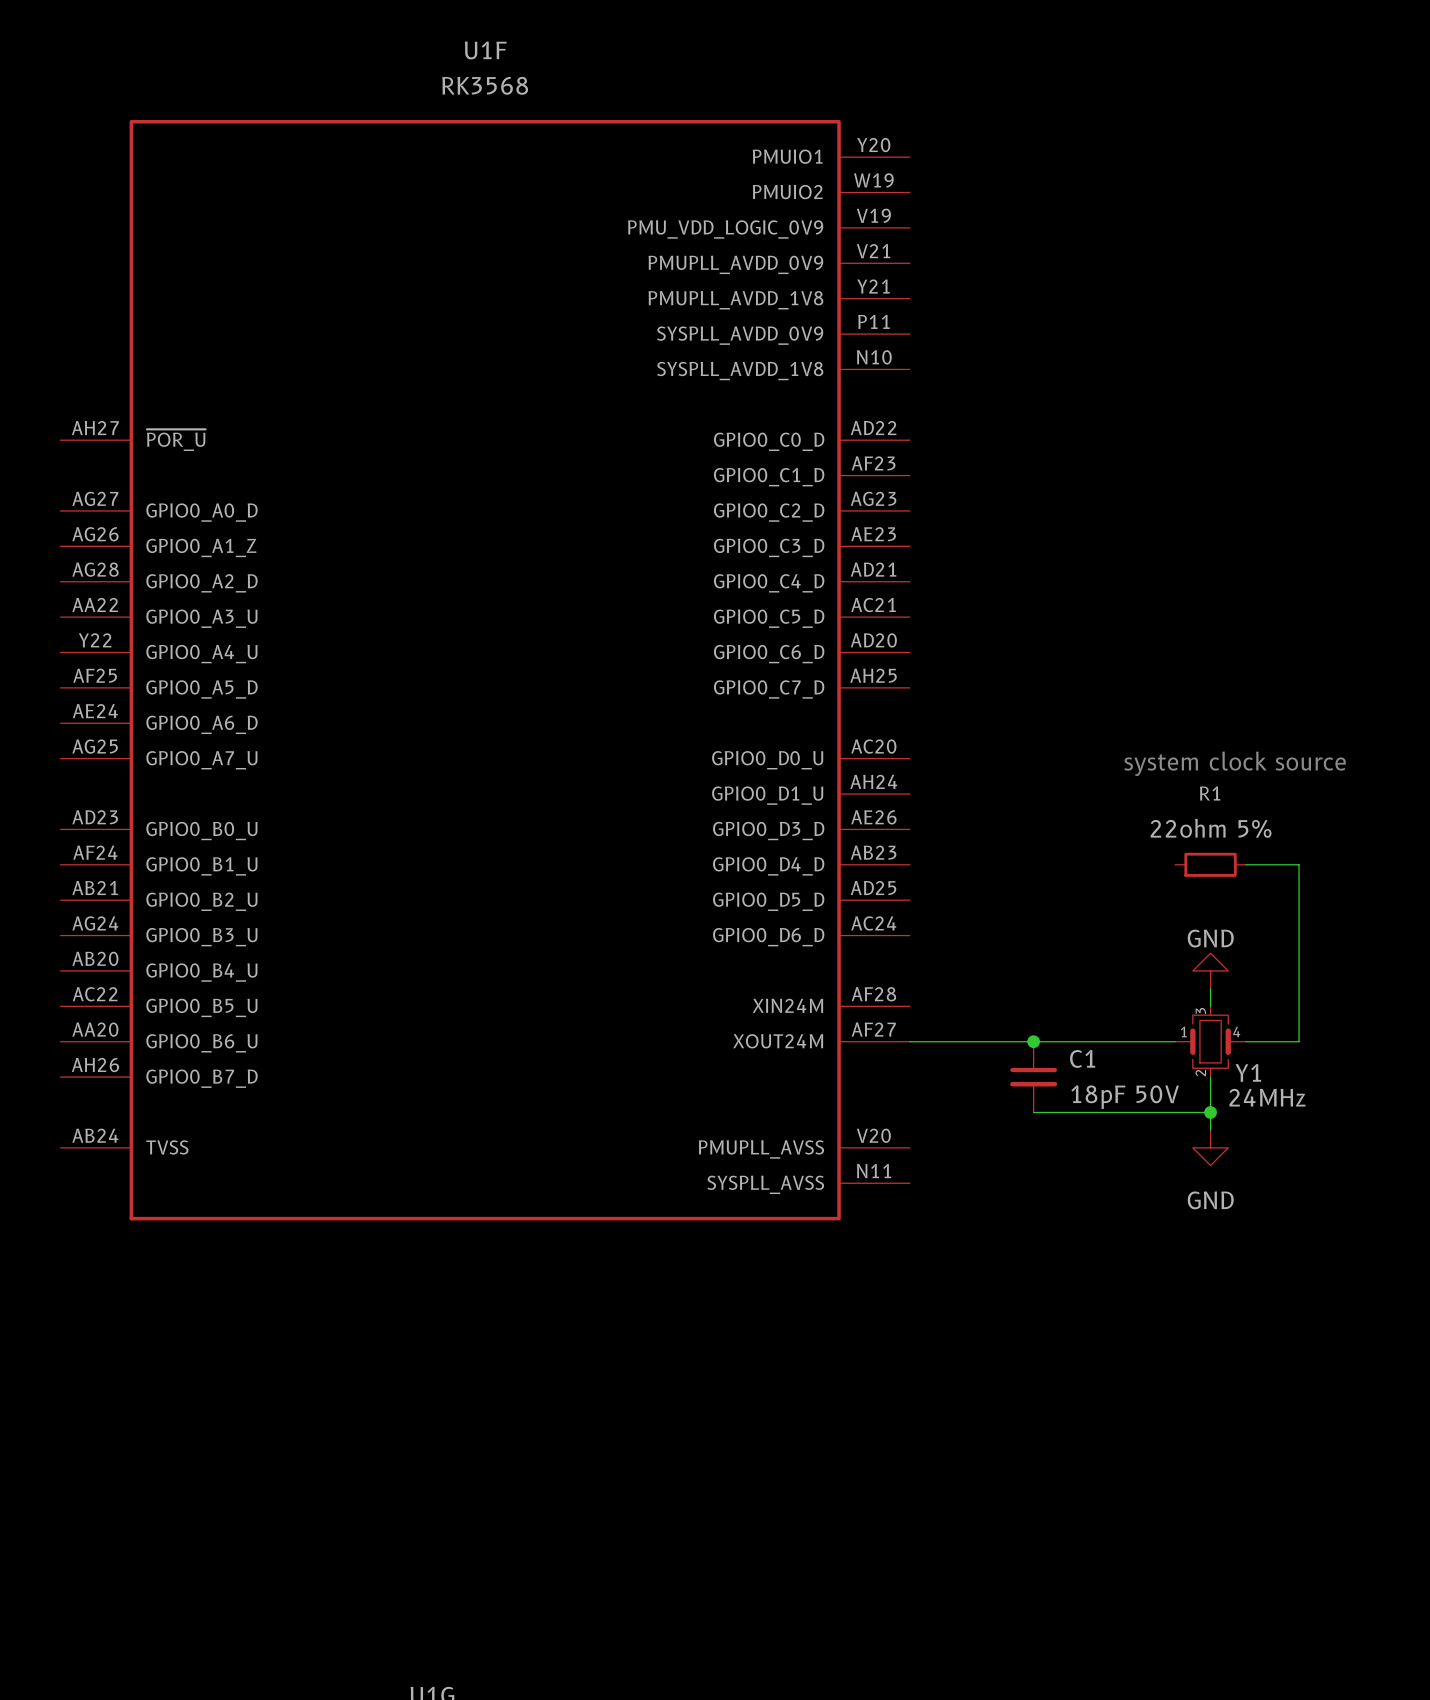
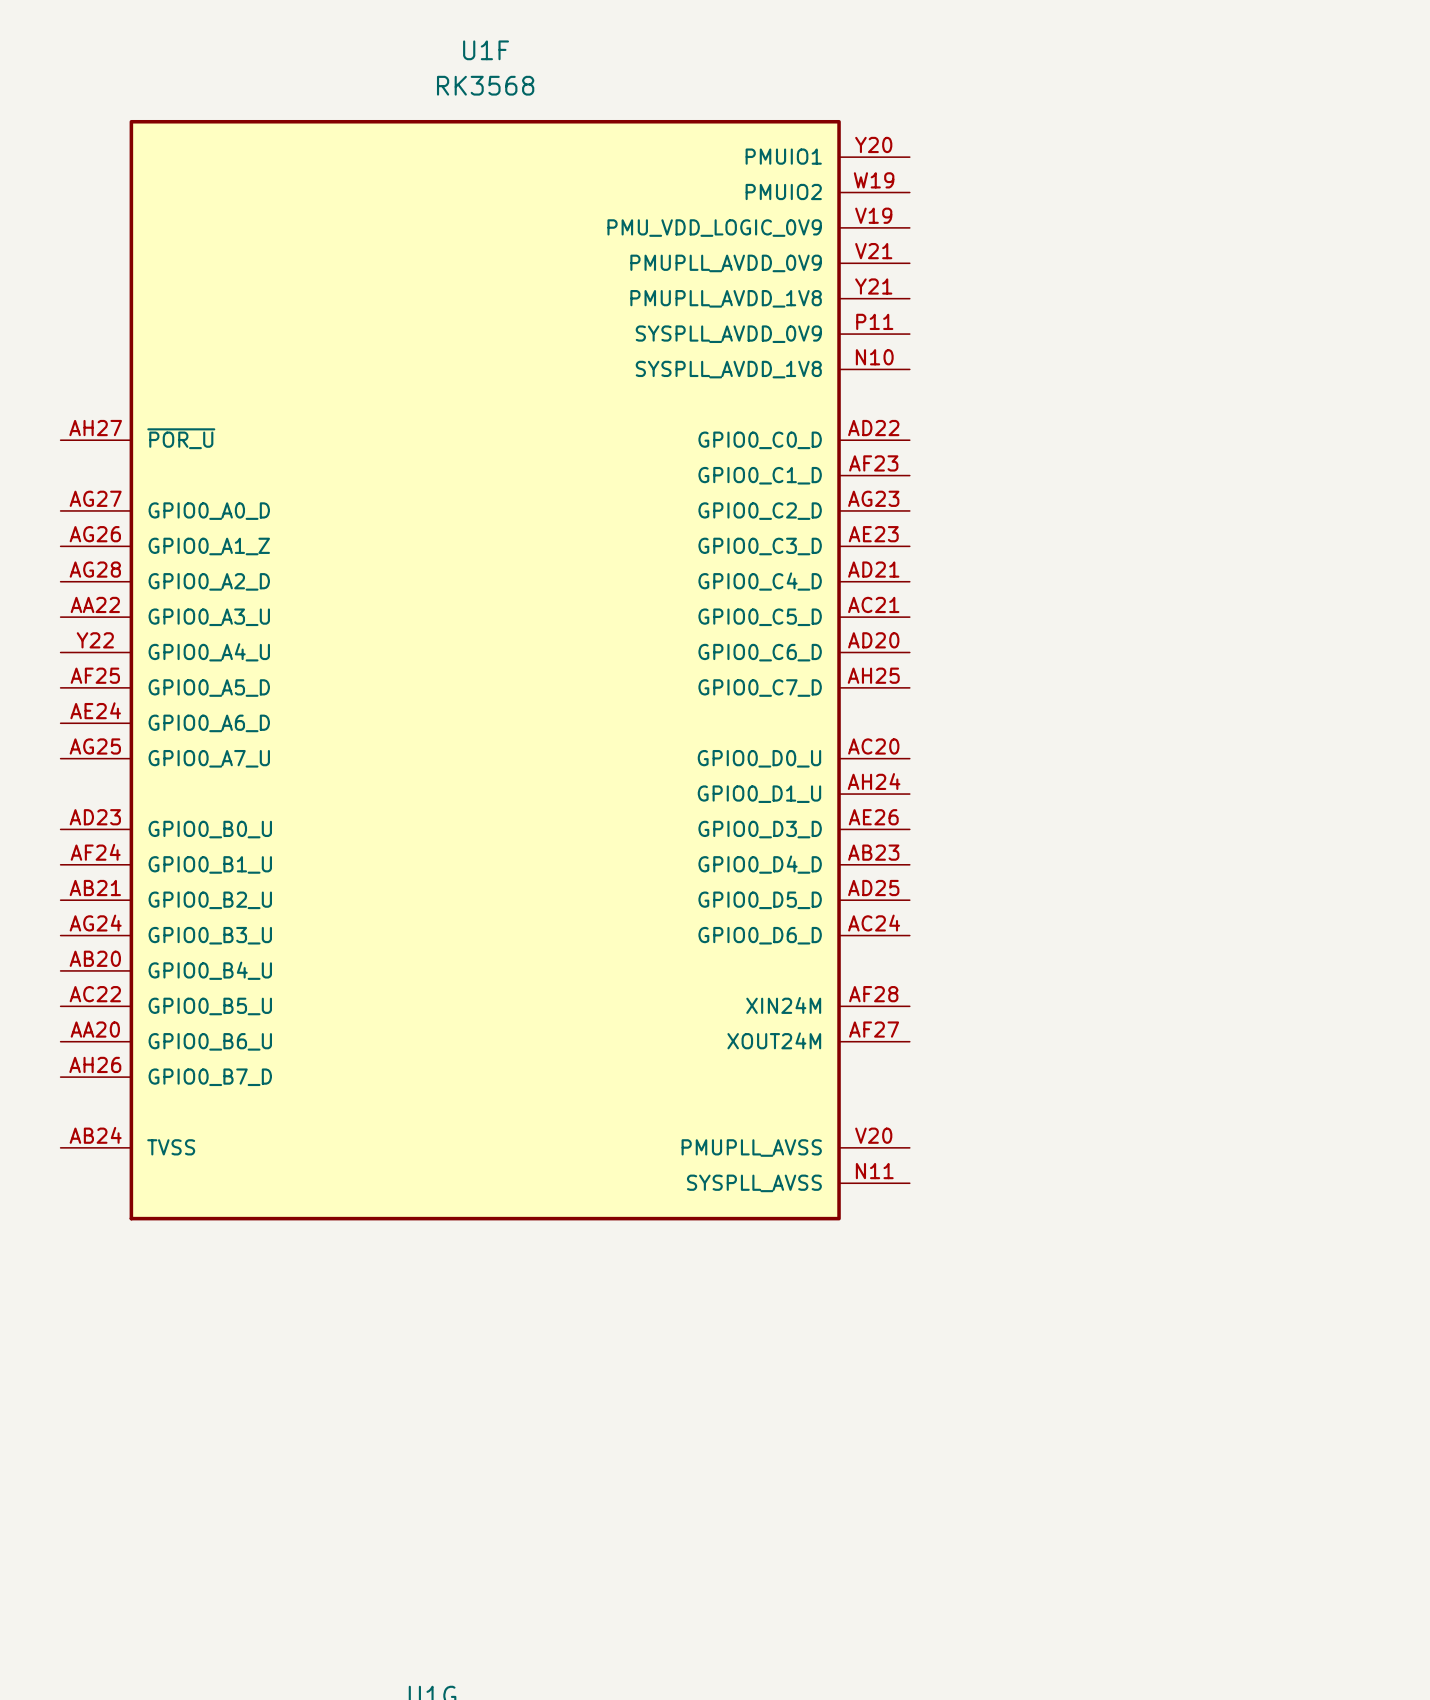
text: system clock source (1235, 763) -> none
R1: 22ohm 5% (1210, 864) -> none
wire: (1245, 864) (1299, 864) (1299, 1041) (1245, 1041) -> none
power symbol: GND (1210, 970) -> none
wire: (1210, 988) (1210, 1006) -> none
wire: (909, 1041) (1175, 1041) -> none
junction: (1033, 1041) -> none
Y1: 24MHz (1210, 1041) -> none
C1: 18pF 50V (1033, 1077) -> none
wire: (1210, 1077) (1210, 1130) -> none
wire: (1033, 1112) (1210, 1112) -> none
junction: (1210, 1112) -> none
power symbol: GND (1210, 1147) -> none

